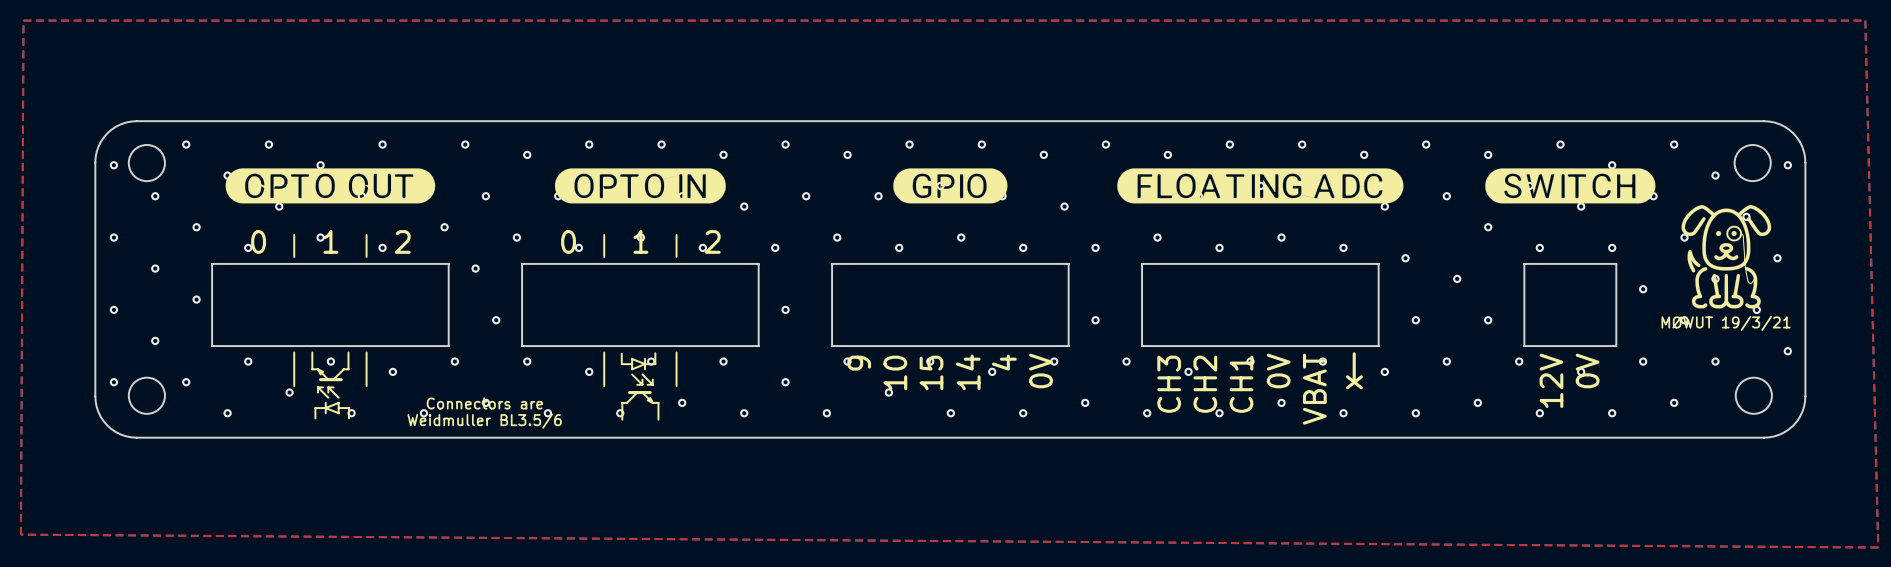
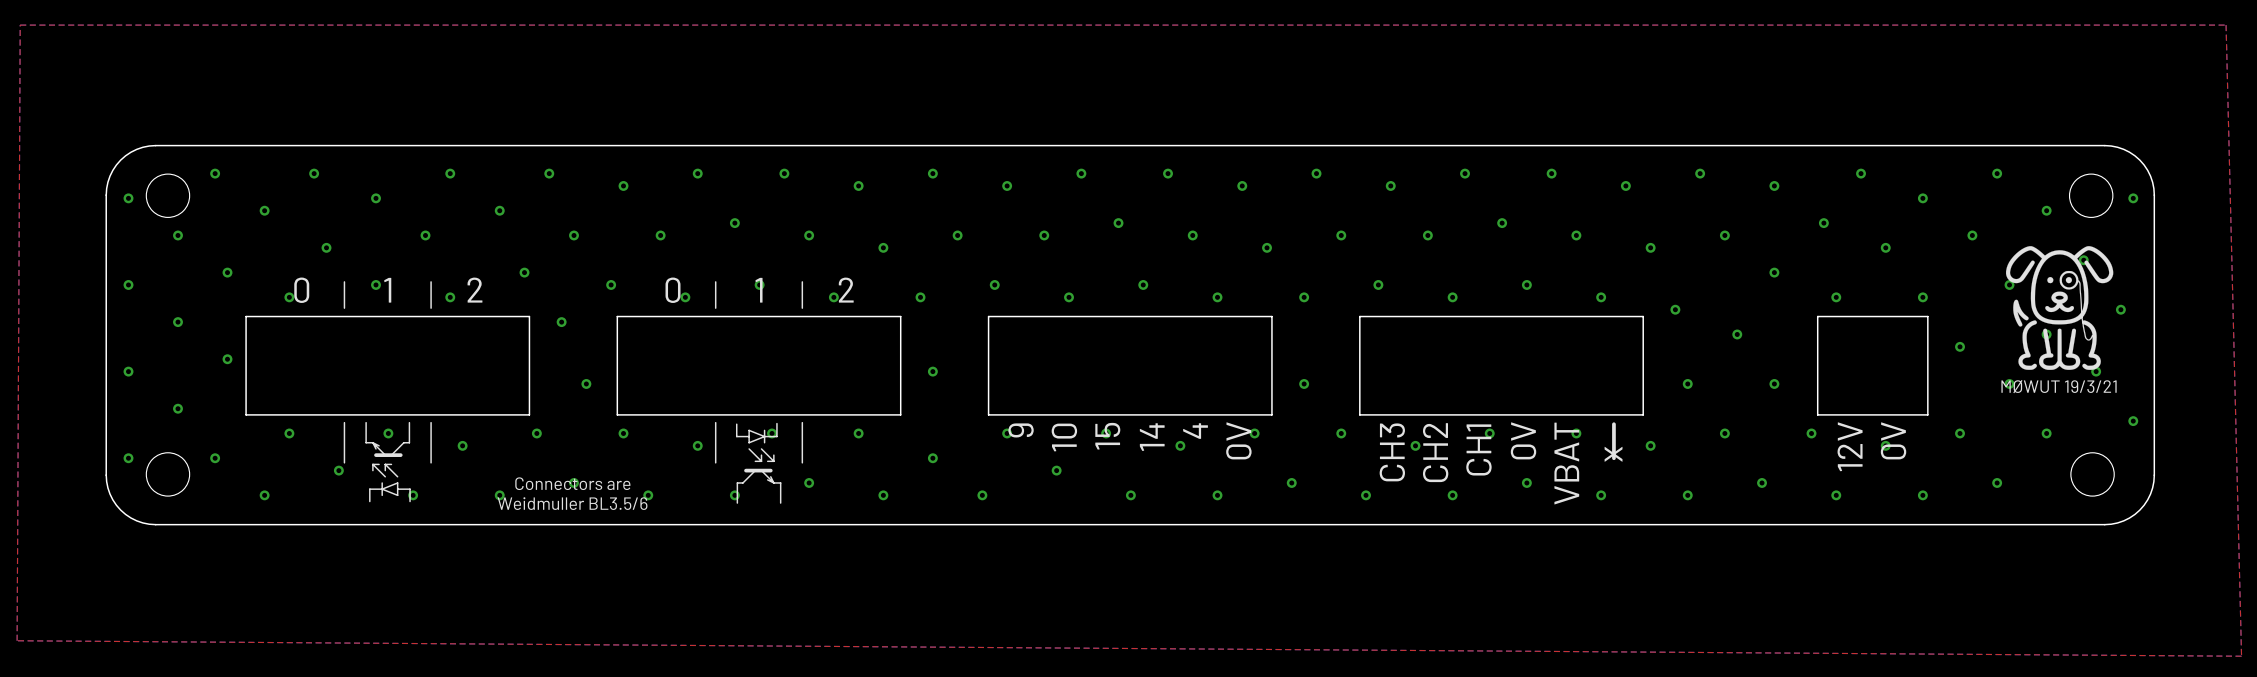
drawing: [225, 168, 436, 204] -> none
drawing: [554, 168, 726, 204] -> none
drawing: [893, 168, 1008, 204] -> none
drawing: [1117, 168, 1404, 204] -> none
drawing: [1485, 168, 1656, 204] -> none

